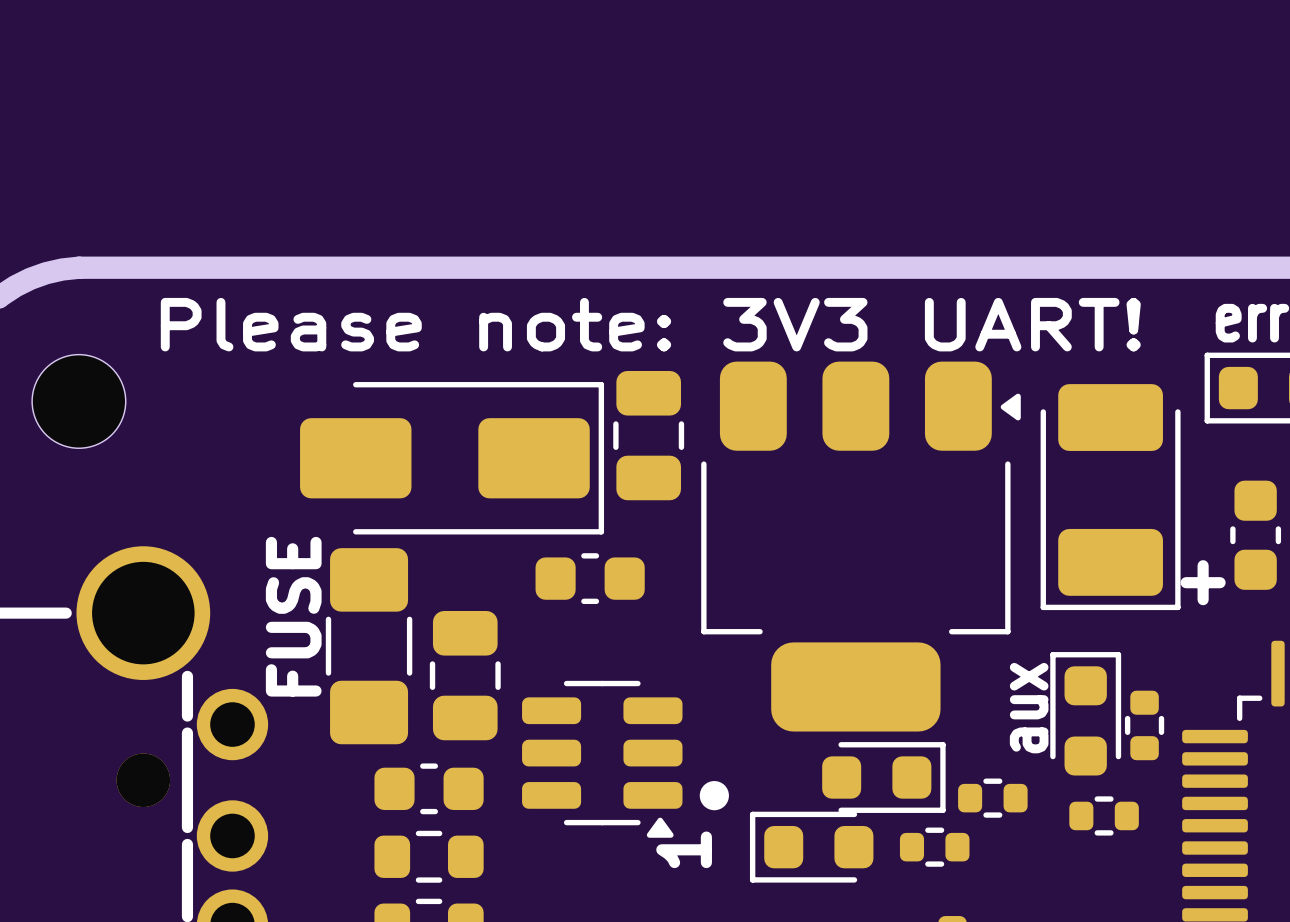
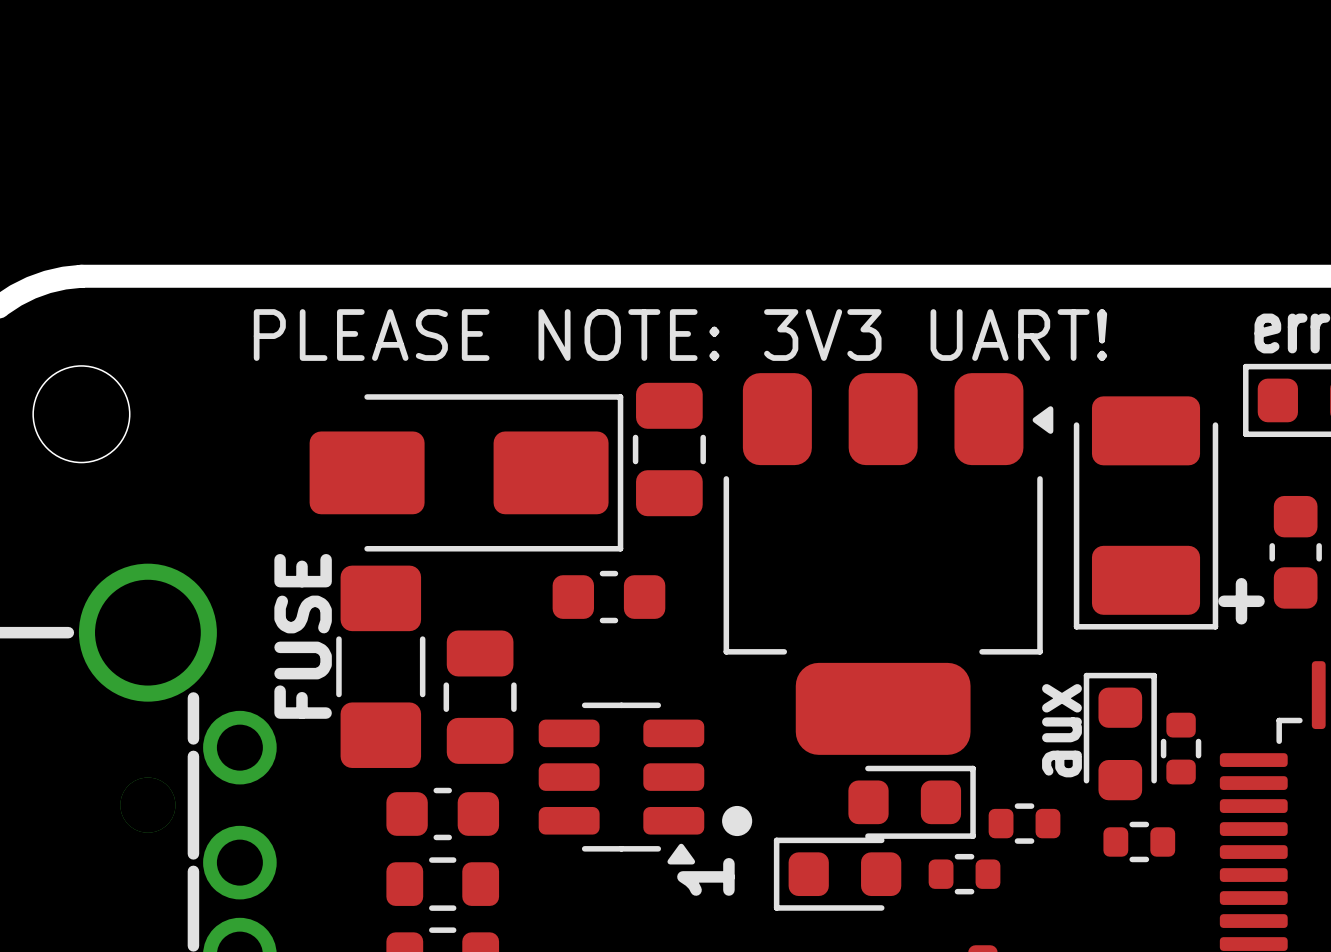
text: Please note: 3V3 UART! (650, 324) -> PLEASE NOTE: 3V3 UART! (680, 335)

